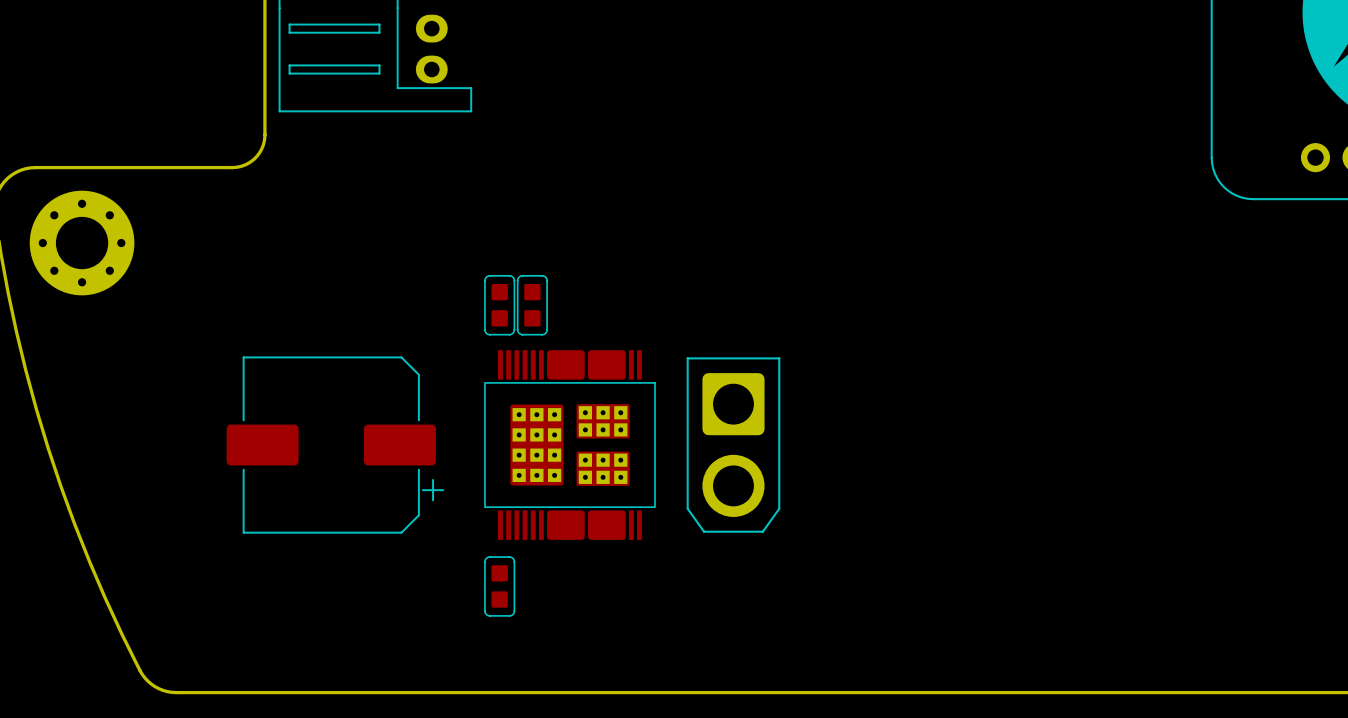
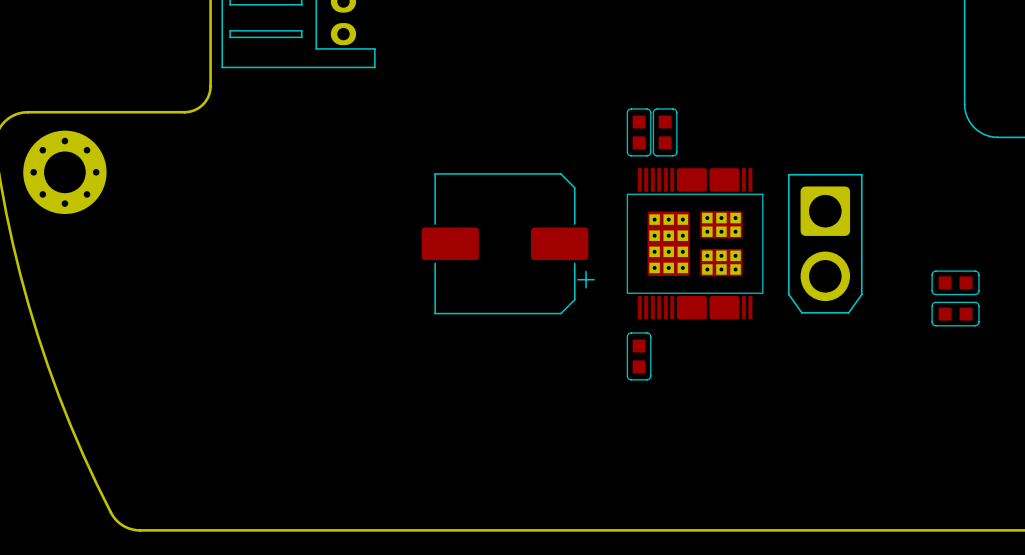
part: none -> (639, 132)
part: none -> (665, 132)
part: (499, 305) -> none
part: (532, 305) -> none
part: none -> (955, 282)
part: none -> (955, 314)
part position: (335, 445) -> (508, 243)
part position: (569, 445) -> (695, 243)
part position: (733, 445) -> (825, 243)
part: none -> (639, 356)
part: (499, 586) -> none

